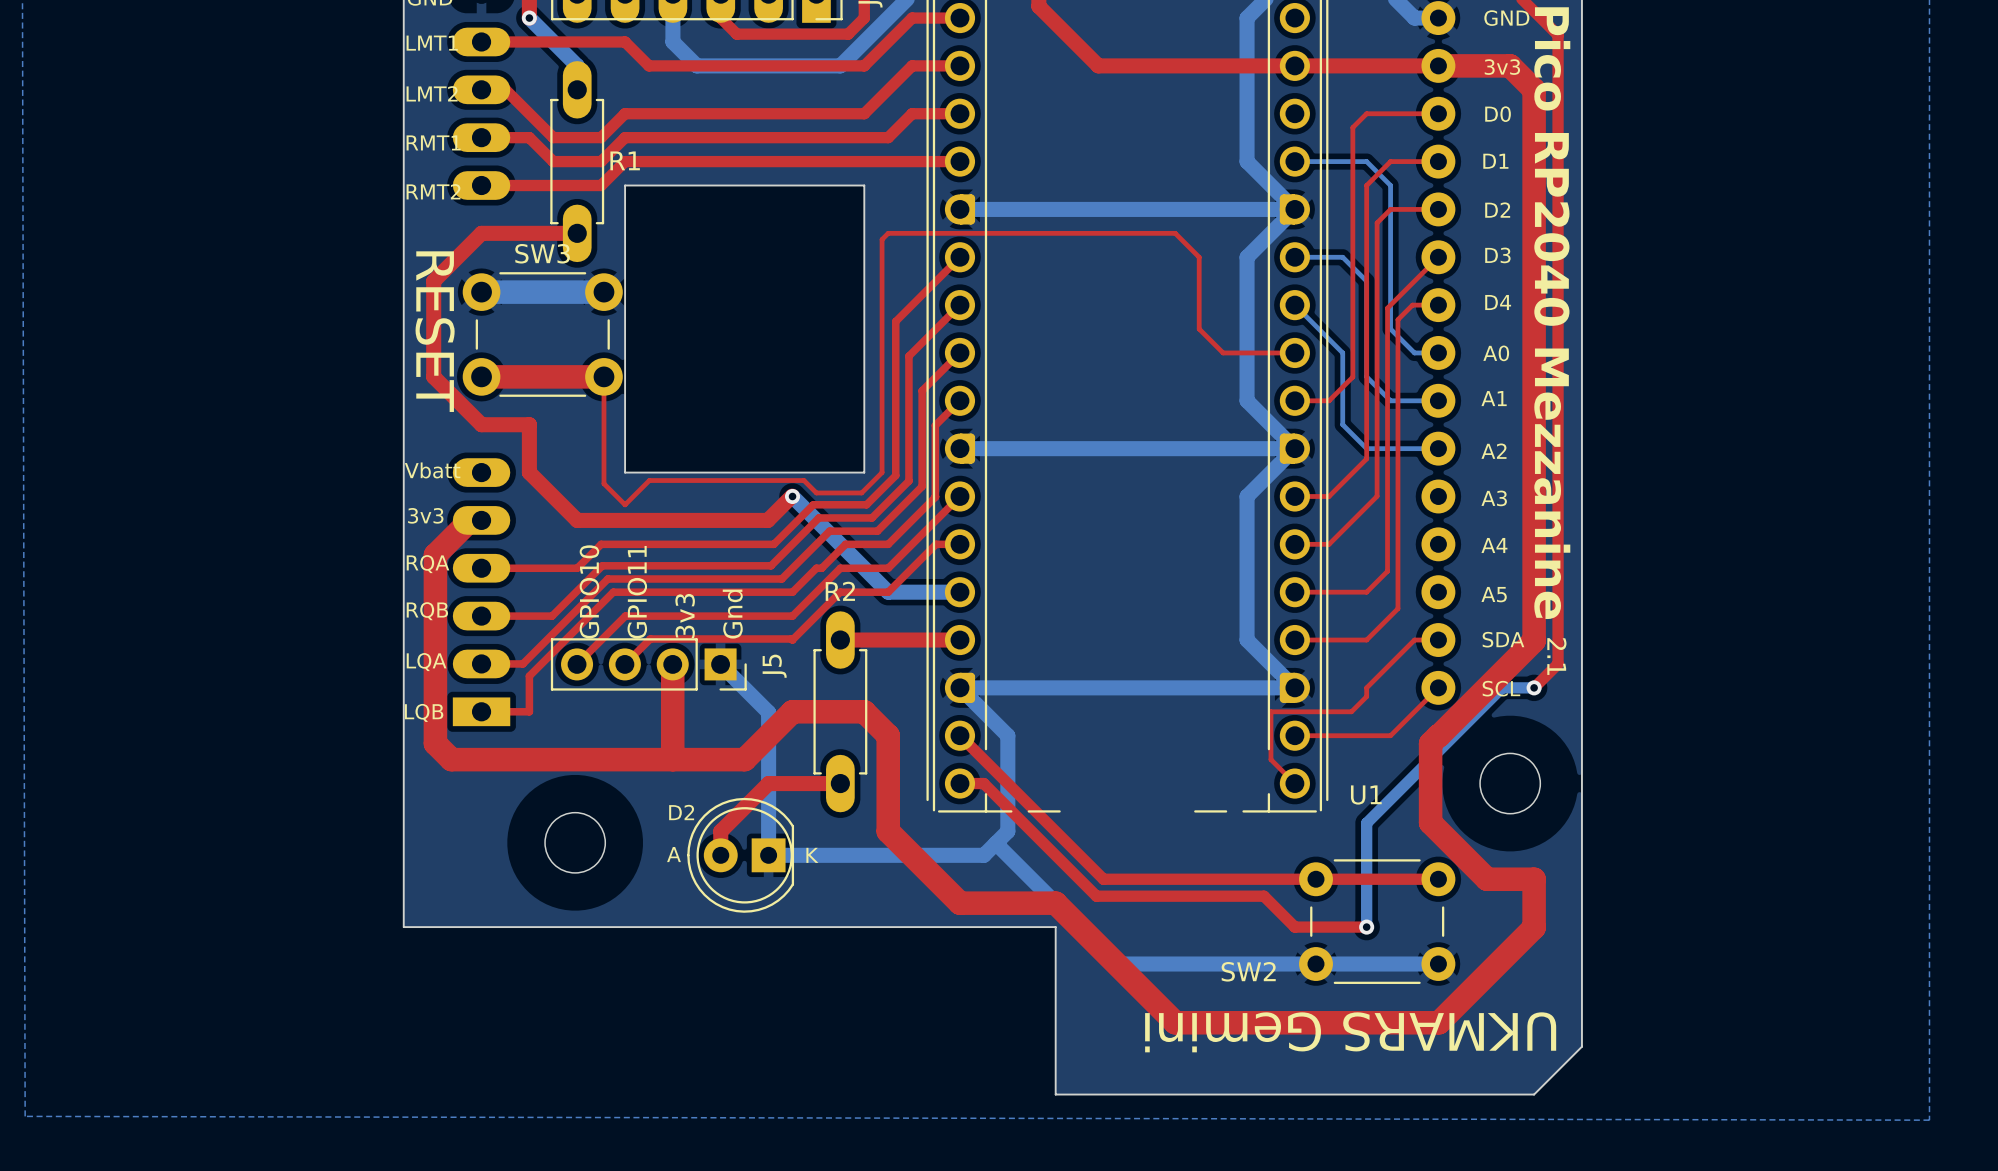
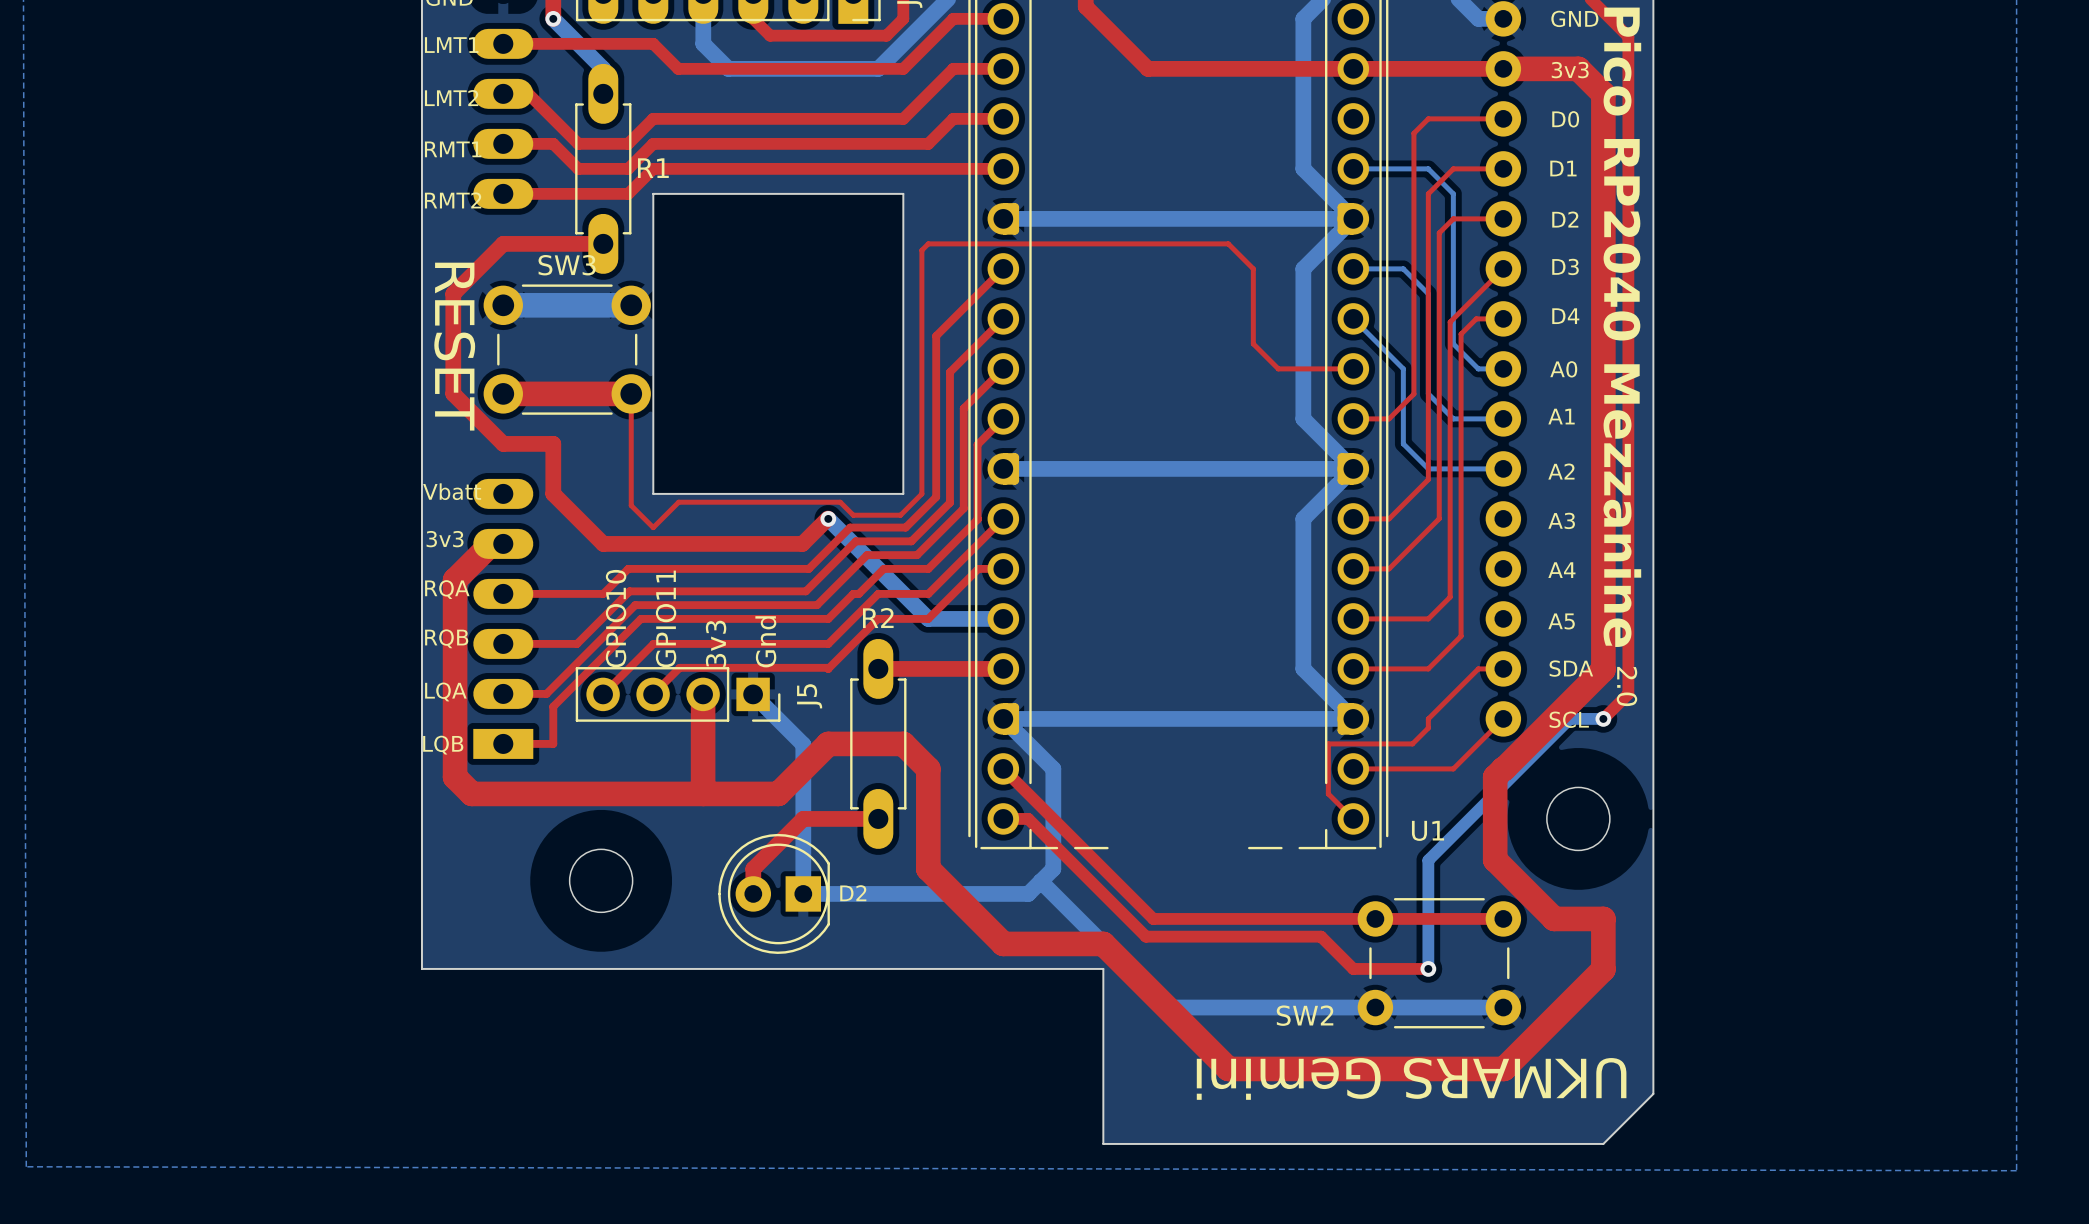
text: 2.1 (1556, 656) -> 2.0 (1626, 686)
D2 name position: D2 (681, 812) -> D2 (853, 893)
text: A (673, 854) -> none
text: K (812, 855) -> none

